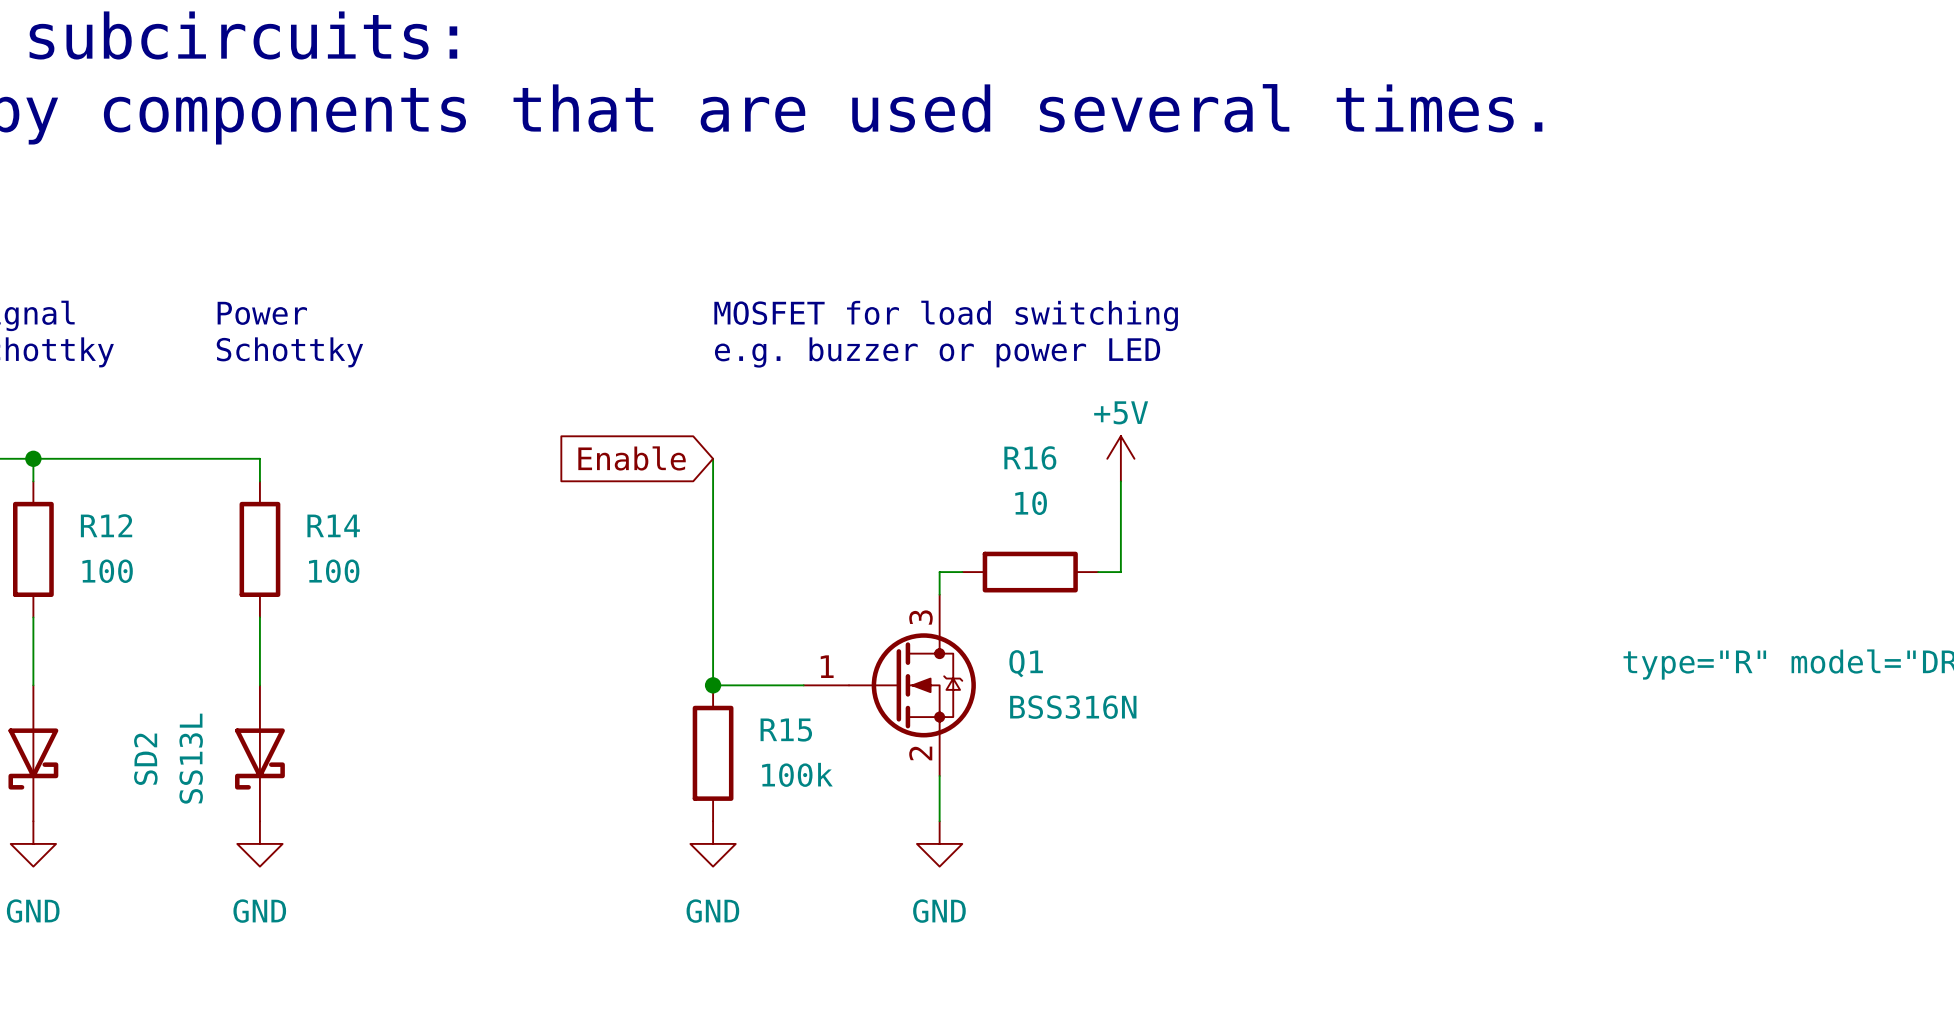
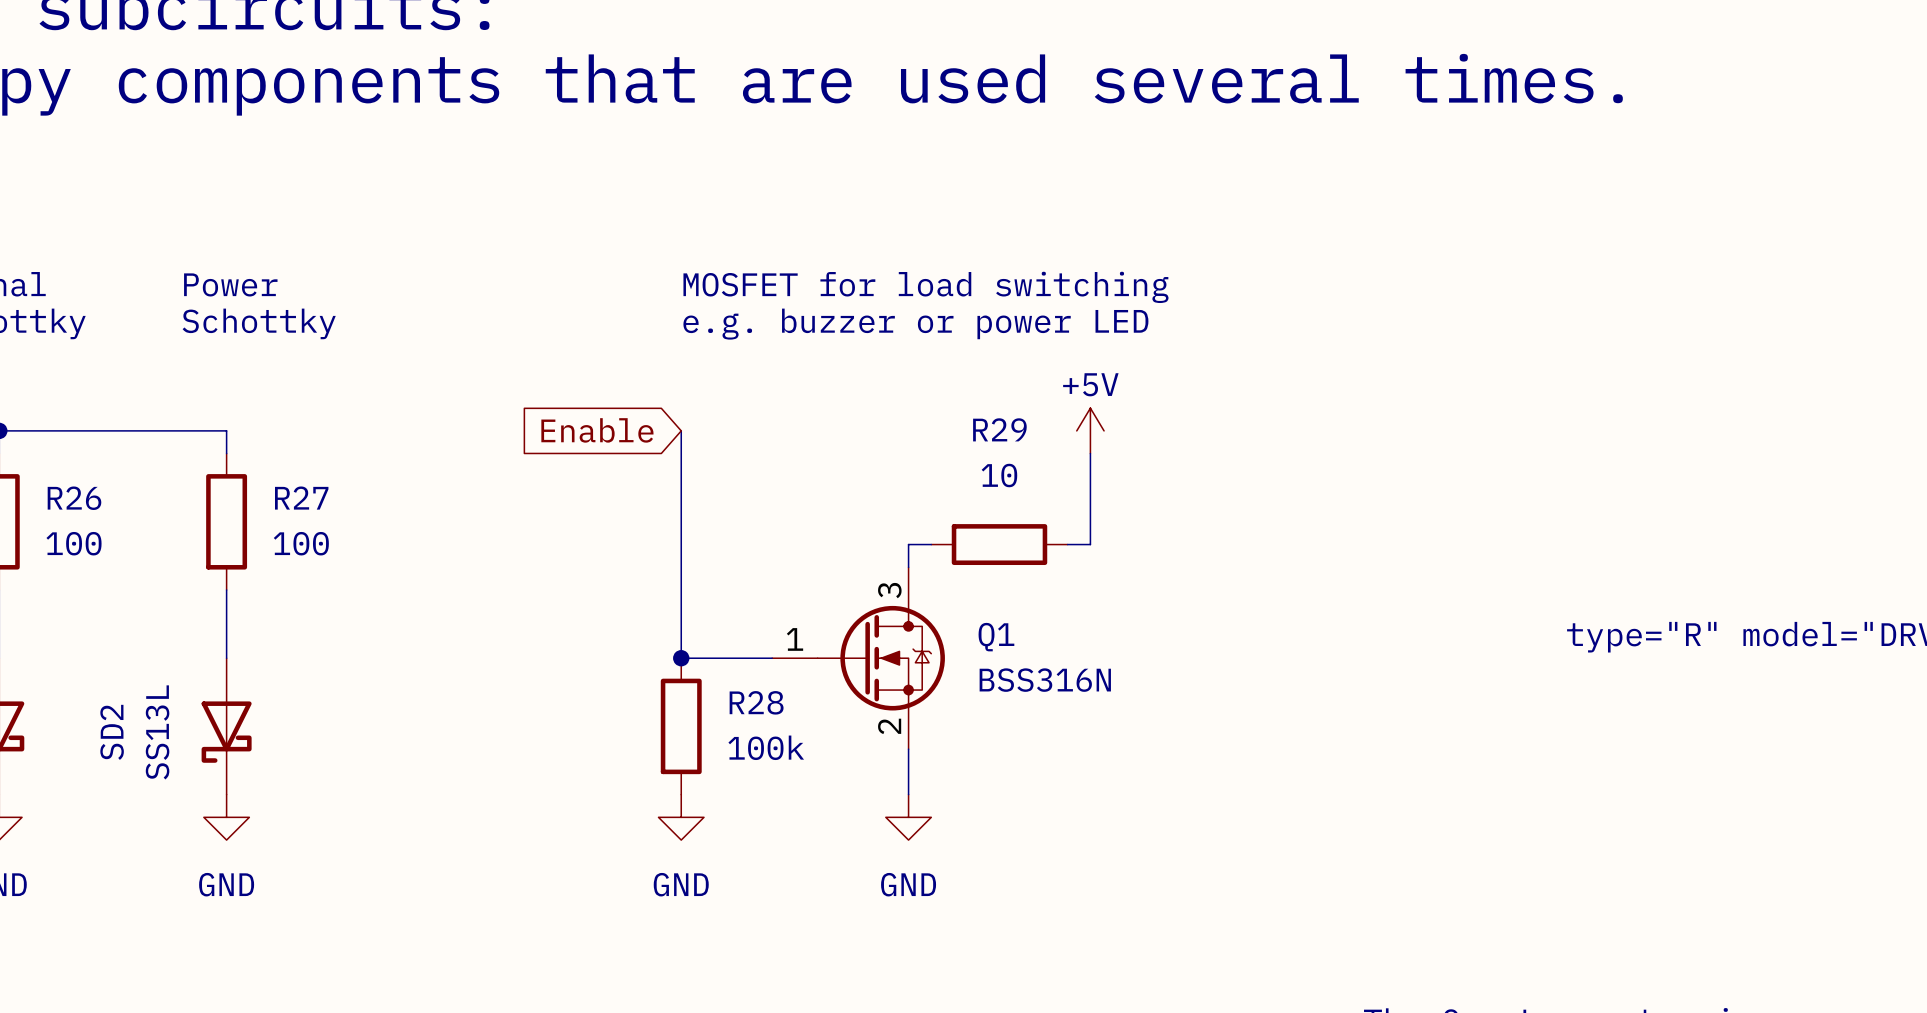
R16 name: R16 (1030, 457) -> R29 (999, 429)
R12 name: R12 (106, 525) -> R26 (74, 498)
R14 name: R14 (333, 525) -> R27 (301, 498)
R15 name: R15 (786, 730) -> R28 (756, 702)

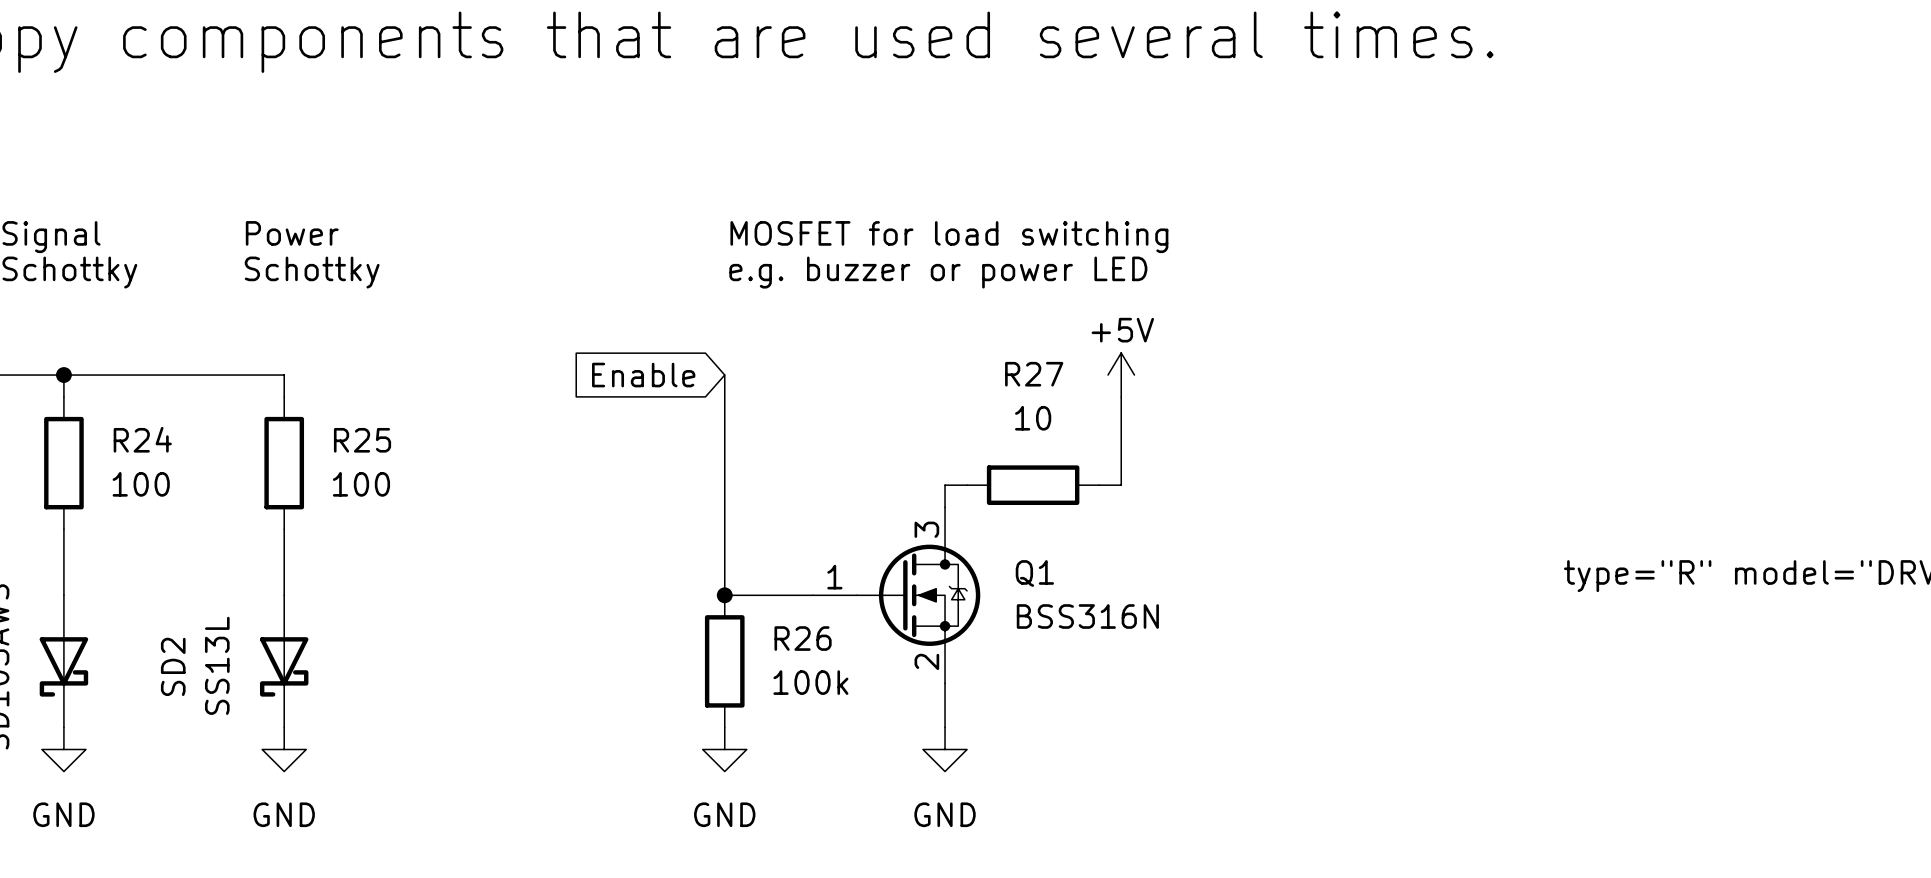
R29 name: R29 (999, 429) -> R27 (1034, 374)
R26 name: R26 (74, 498) -> R24 (142, 439)
R27 name: R27 (301, 498) -> R25 (362, 440)
R28 name: R28 (756, 702) -> R26 (803, 638)

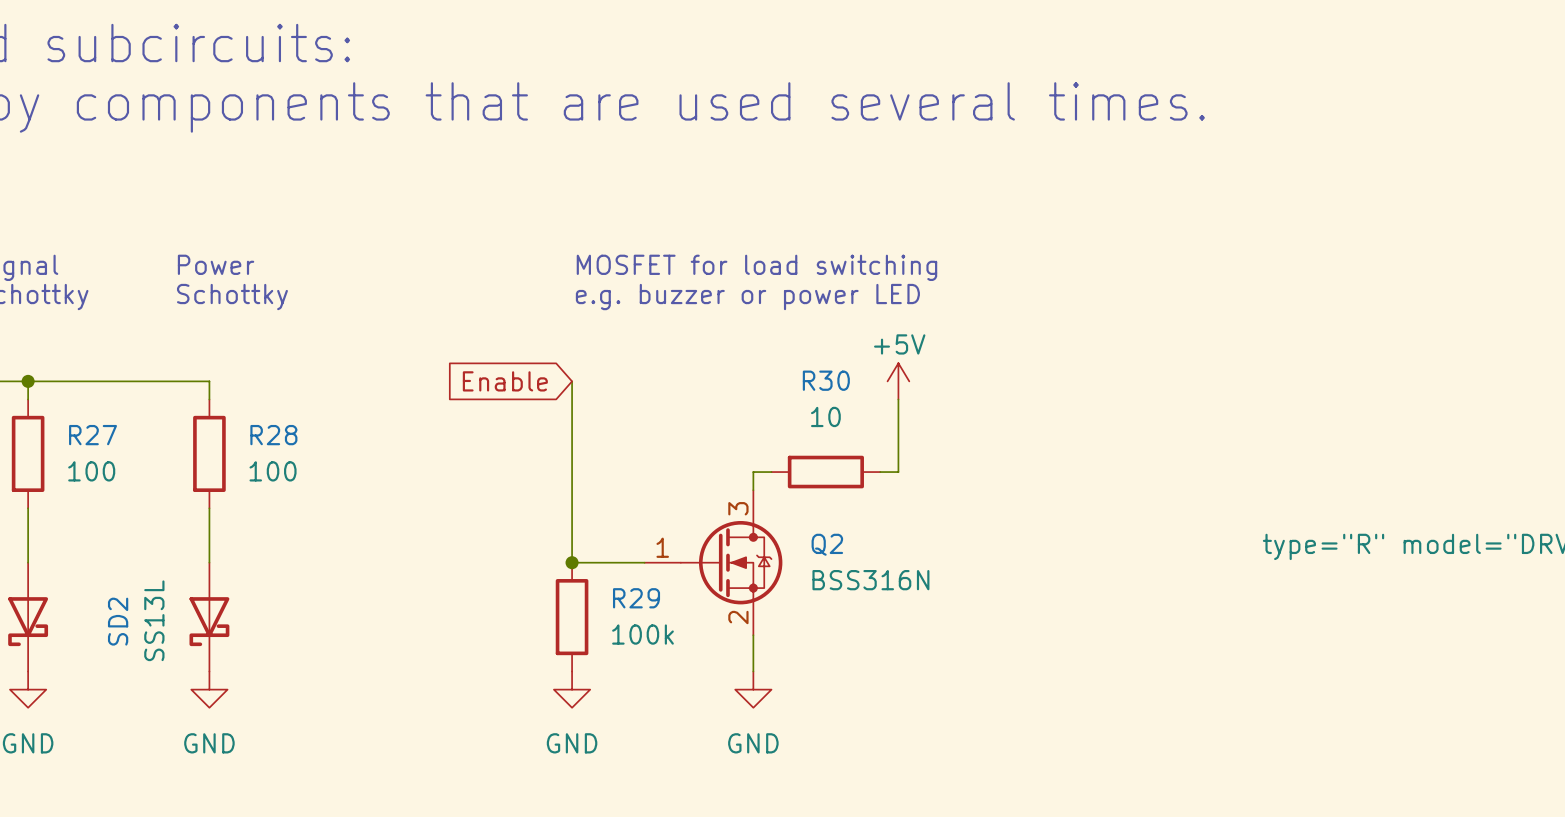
R27 name: R27 (1034, 374) -> R30 (826, 380)
R24 name: R24 (142, 439) -> R27 (93, 435)
R25 name: R25 (362, 440) -> R28 (273, 435)
Q1 name: Q1 (1034, 573) -> Q2 (827, 544)
R26 name: R26 (803, 638) -> R29 (636, 598)

